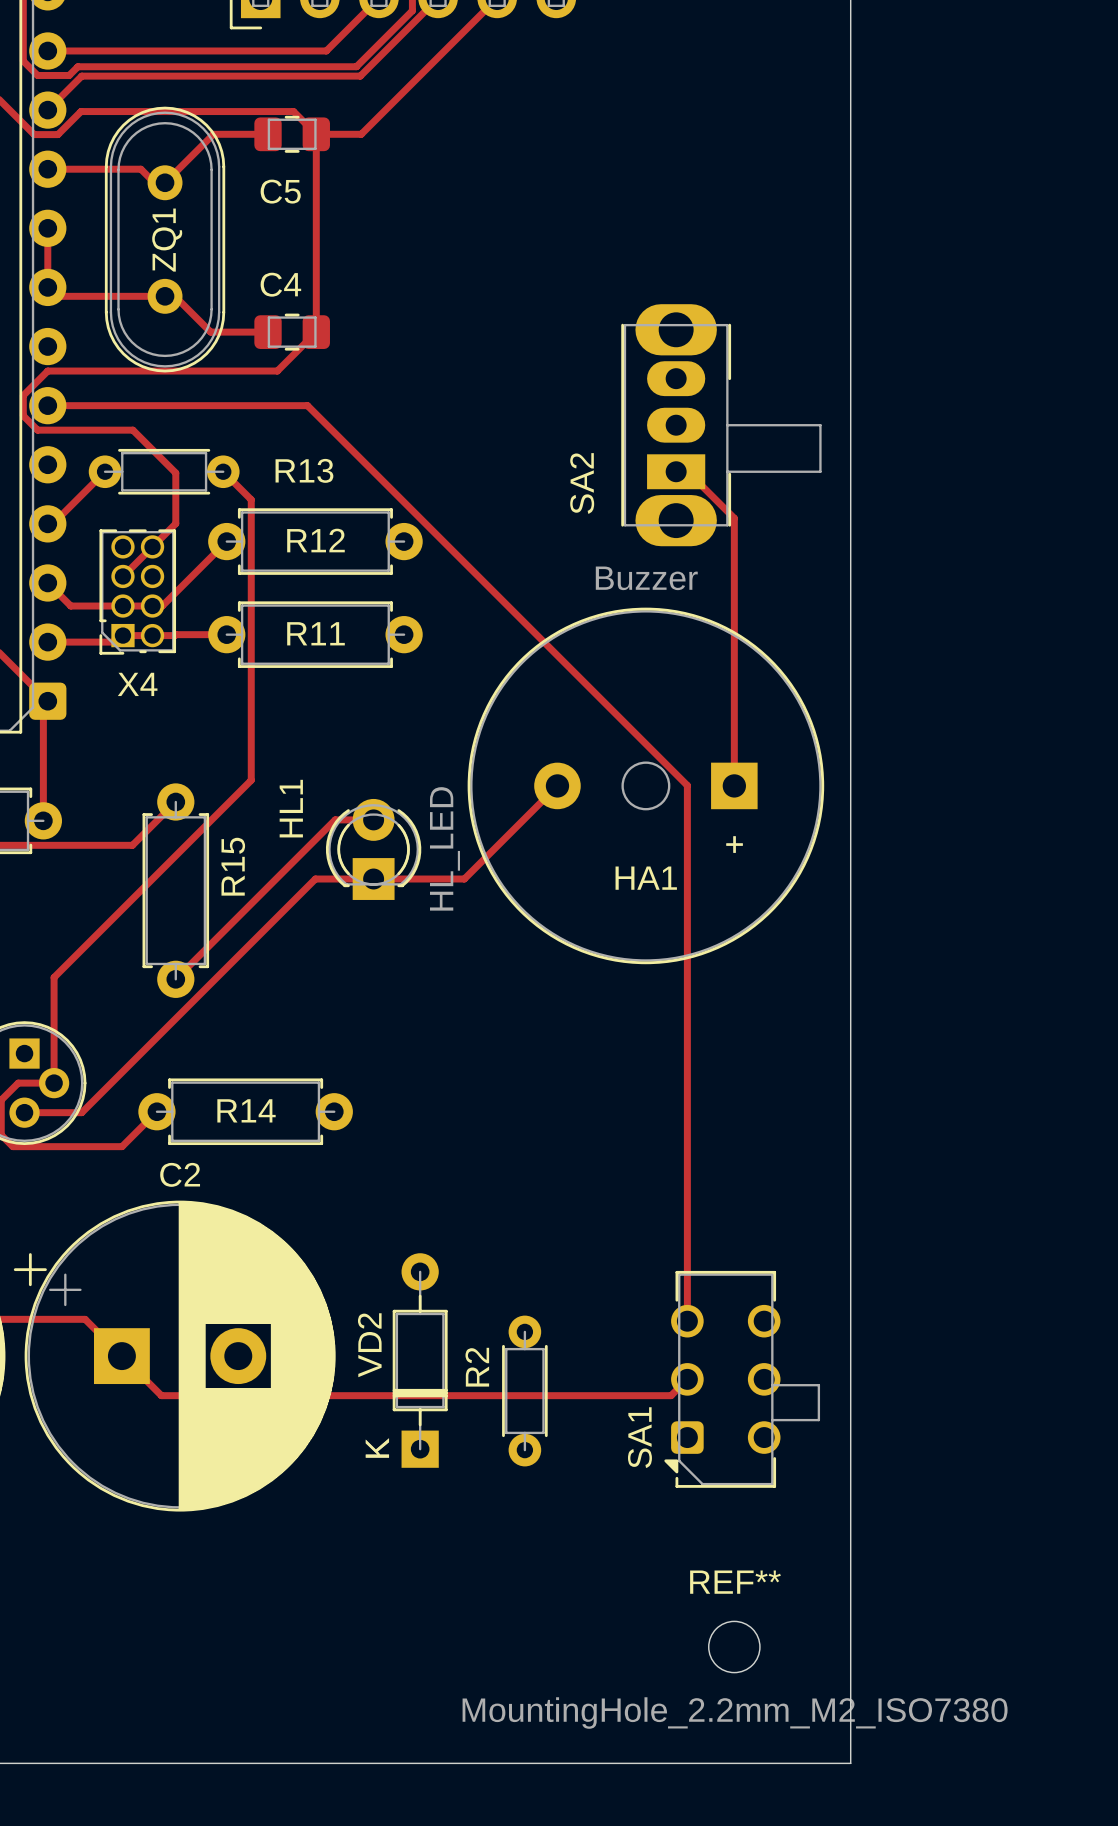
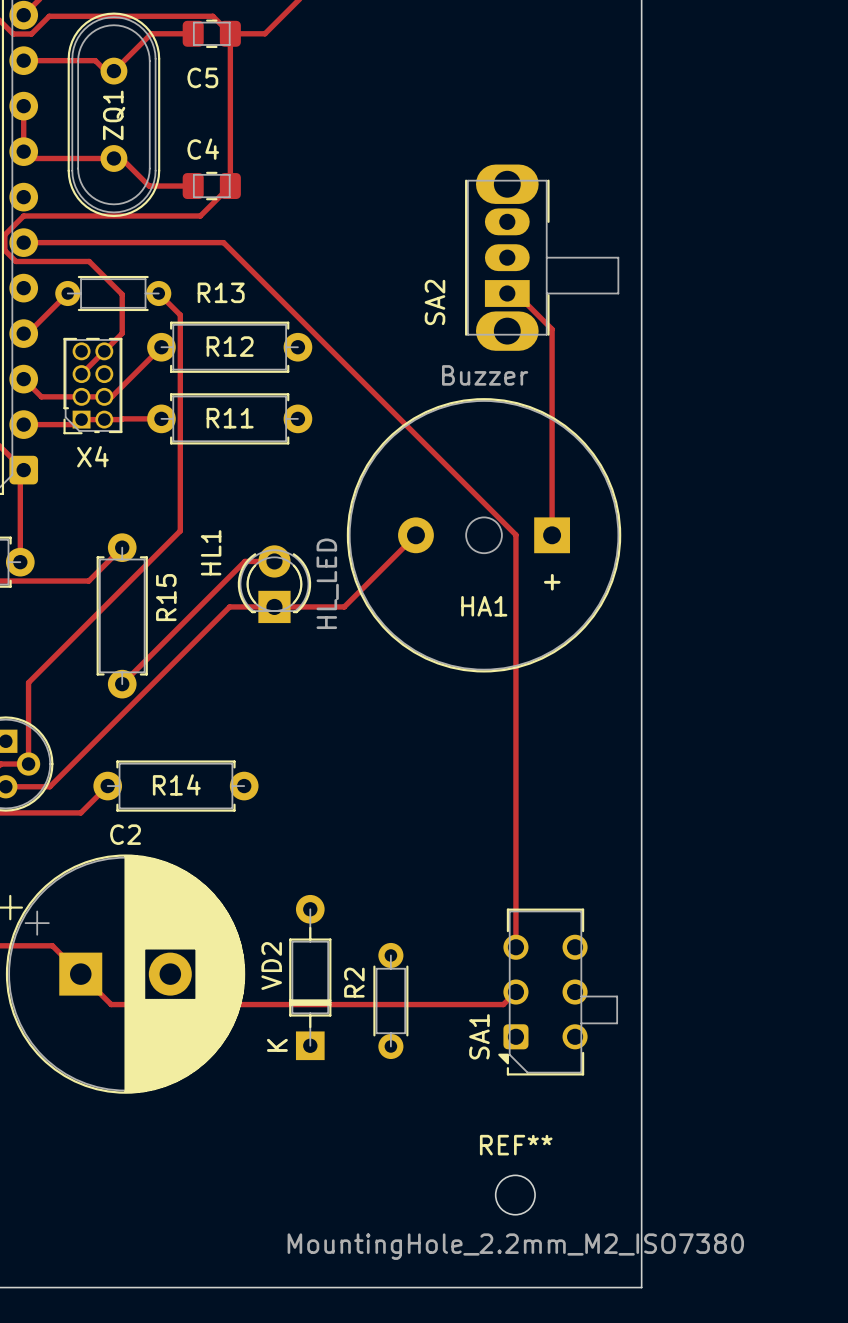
REF** position: (734, 1647) -> (515, 1195)

